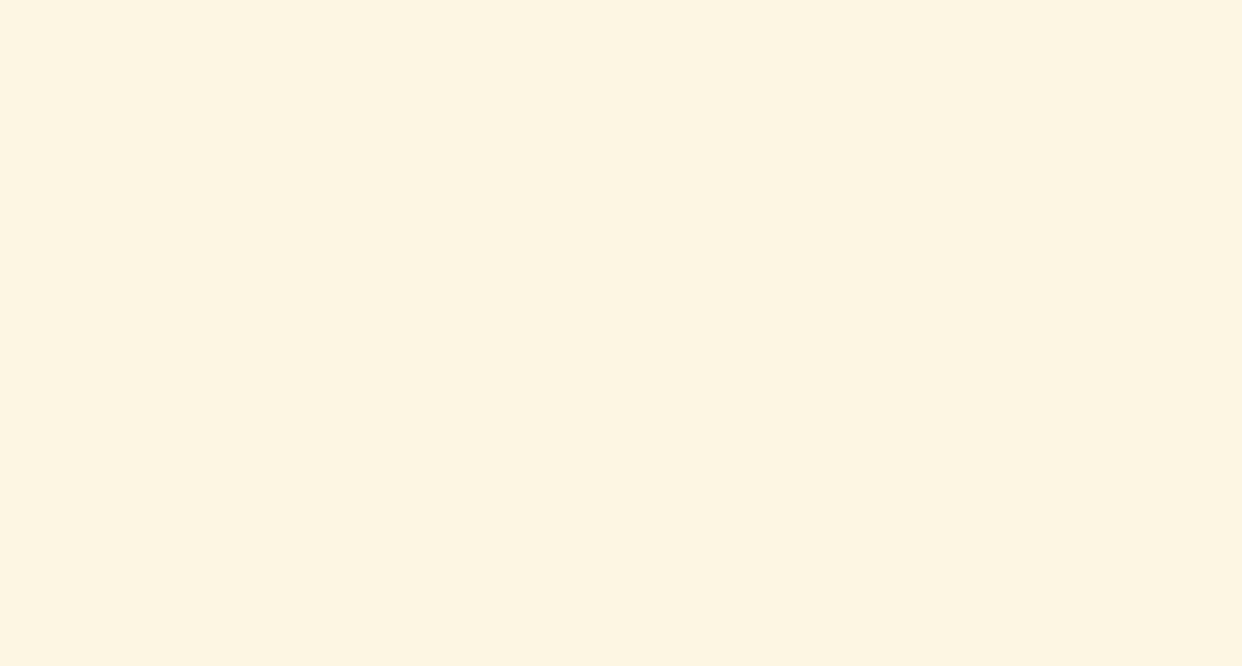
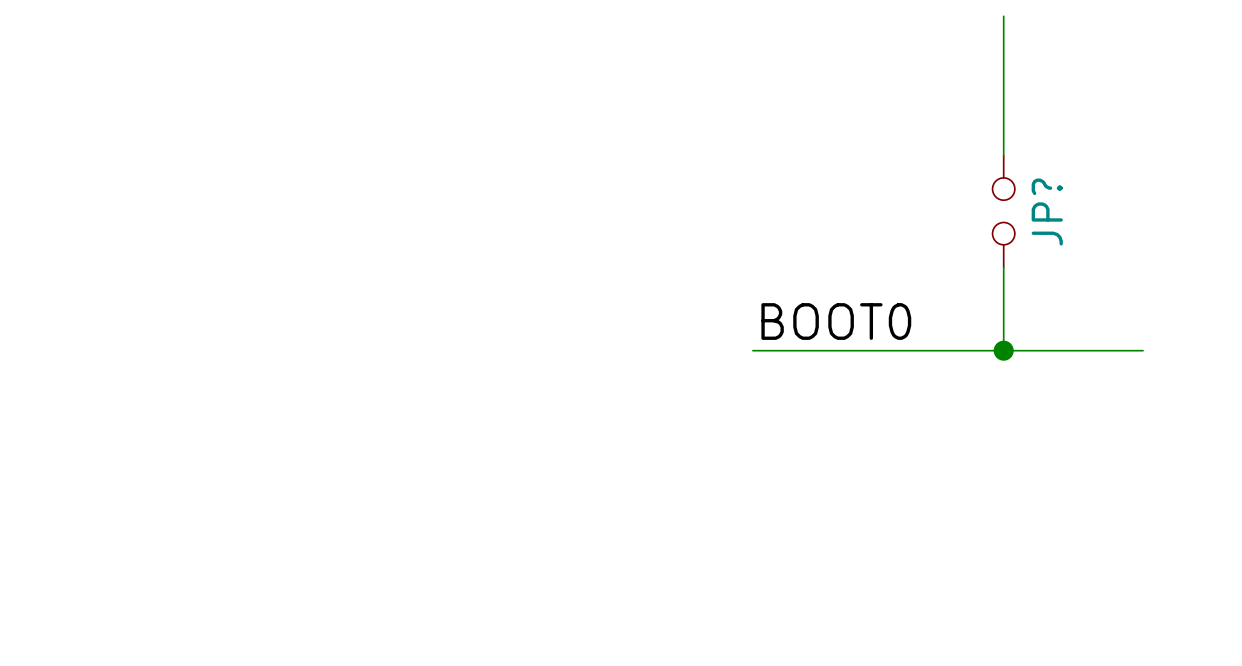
wire: none -> (1003, 16) (1003, 155)
JP?: none -> (1003, 211)
wire: none -> (1003, 267) (1003, 350)
label: none -> BOOT0 (836, 321)
wire: none -> (752, 350) (1143, 350)
junction: none -> (1003, 350)

